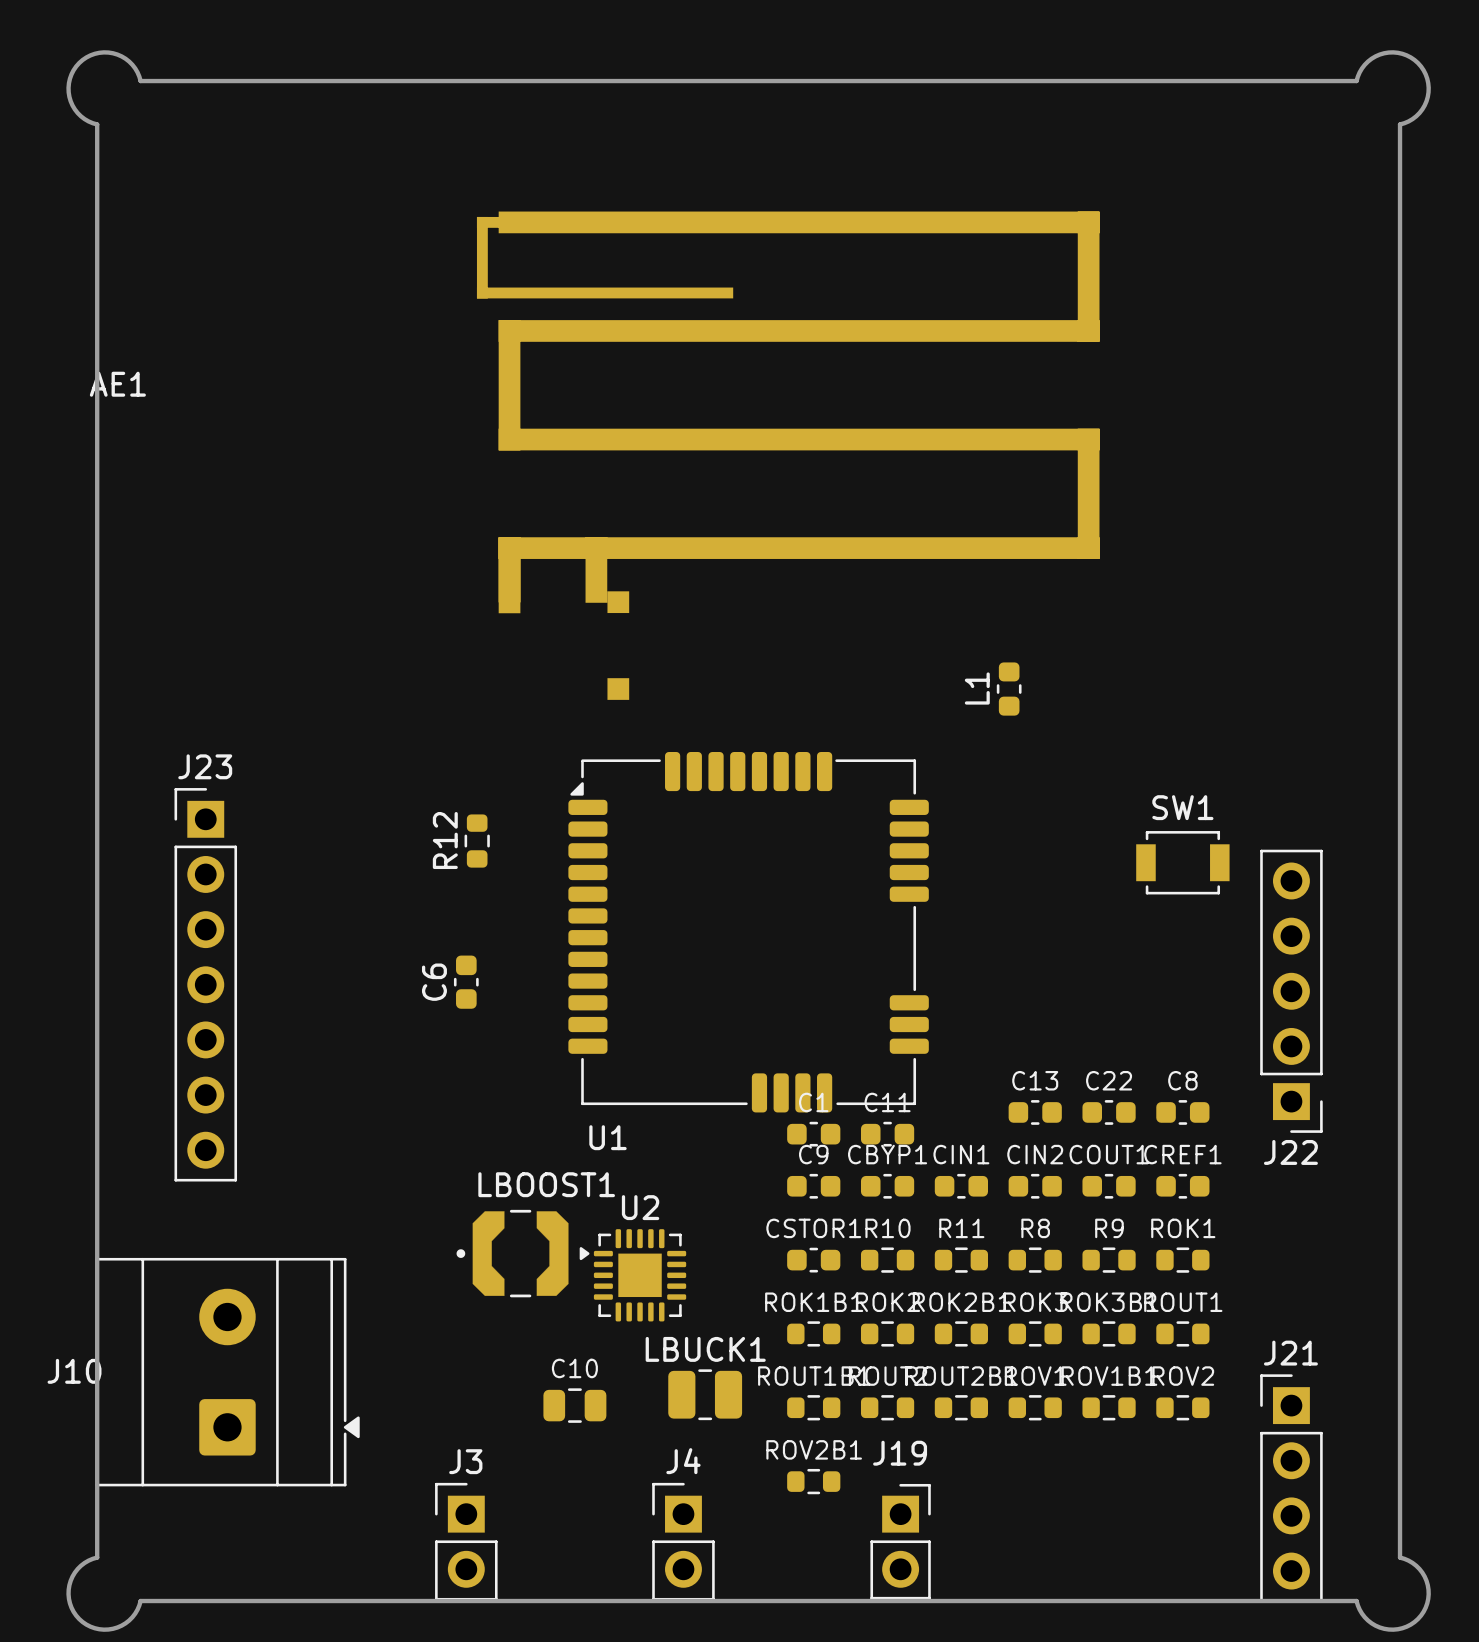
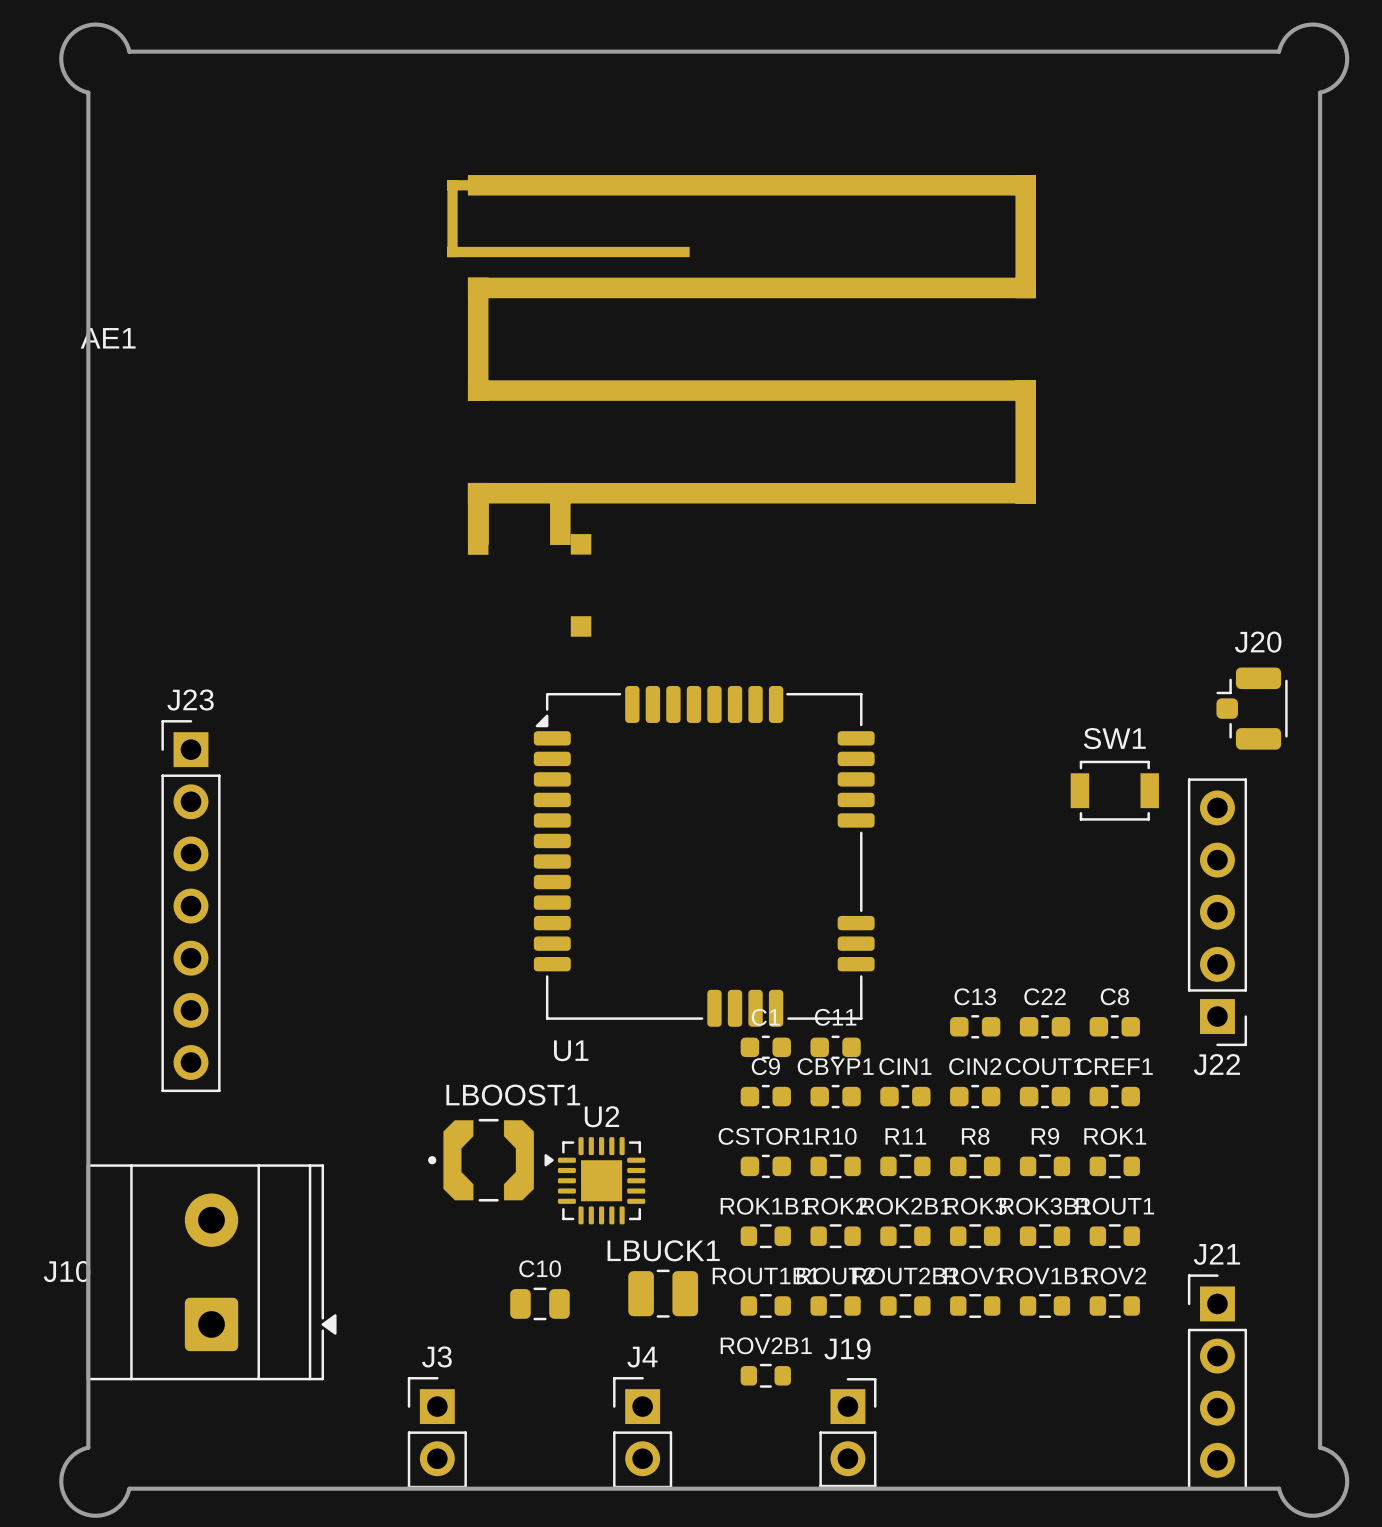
L1: (1009, 689) -> none
J20: none -> (1252, 708)
R12: (477, 841) -> none
C6: (466, 982) -> none

